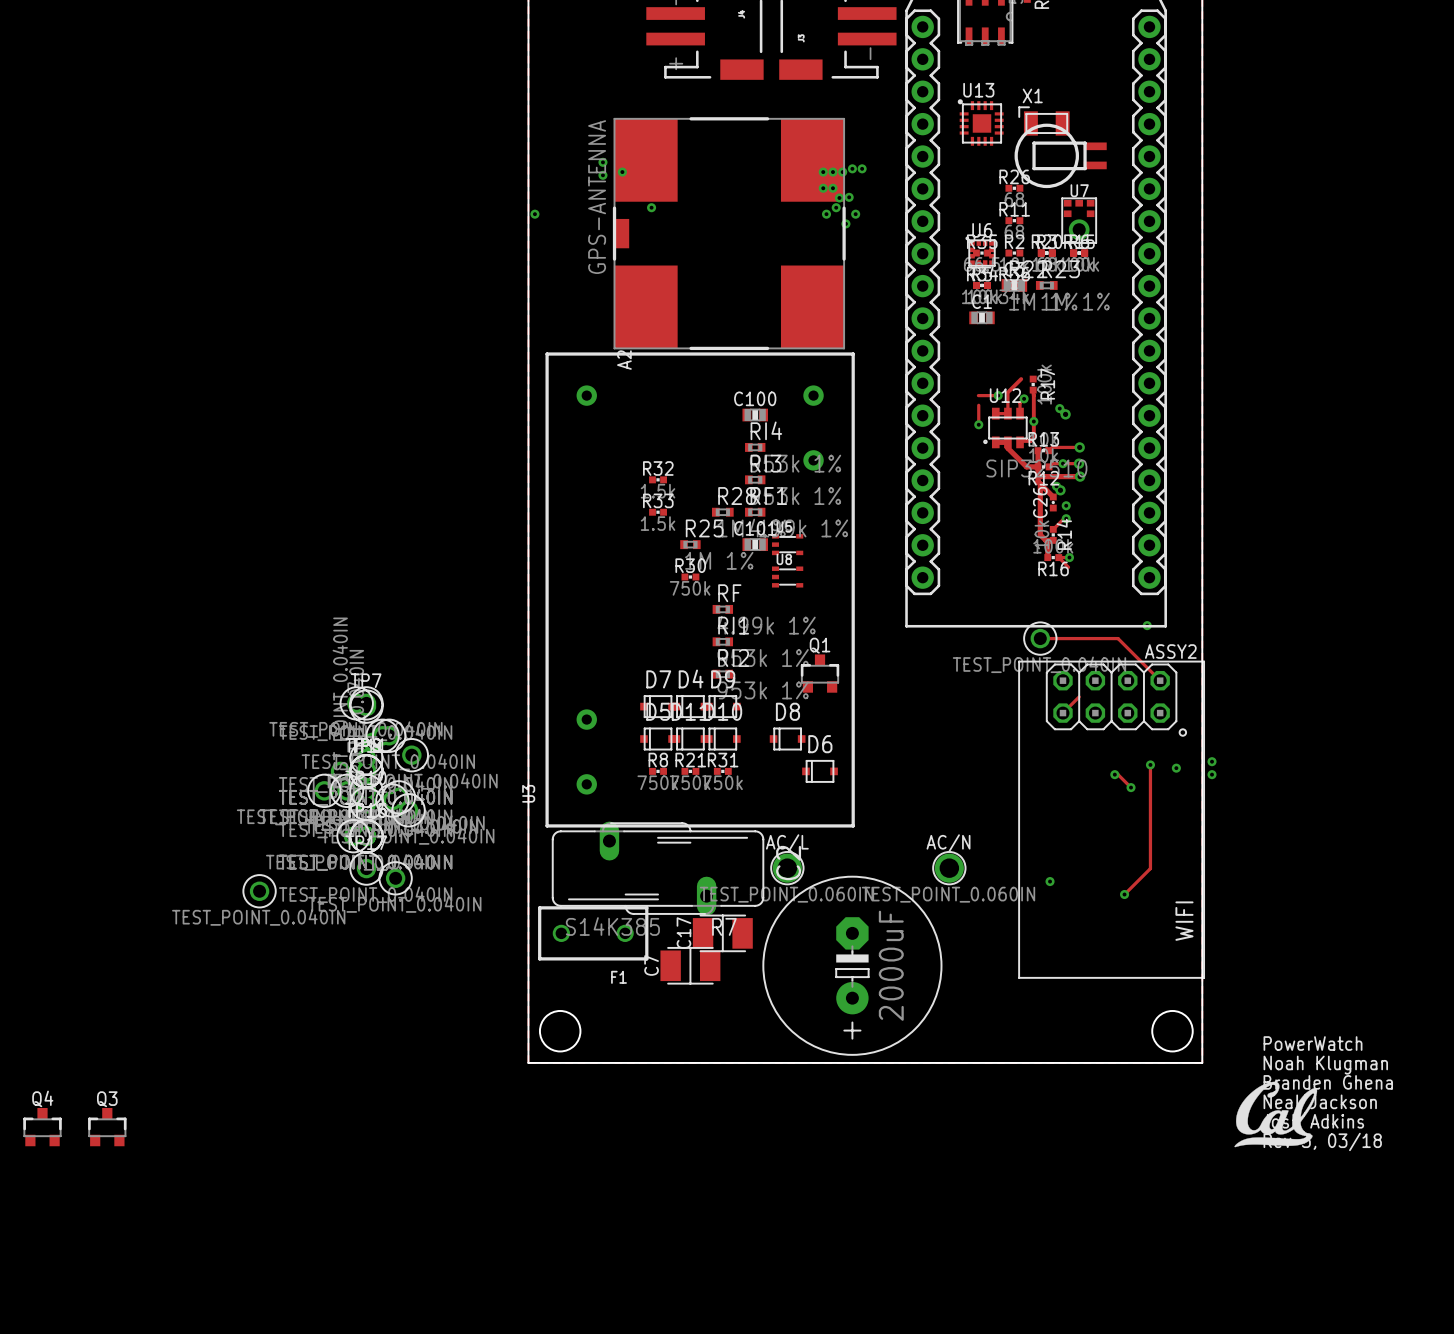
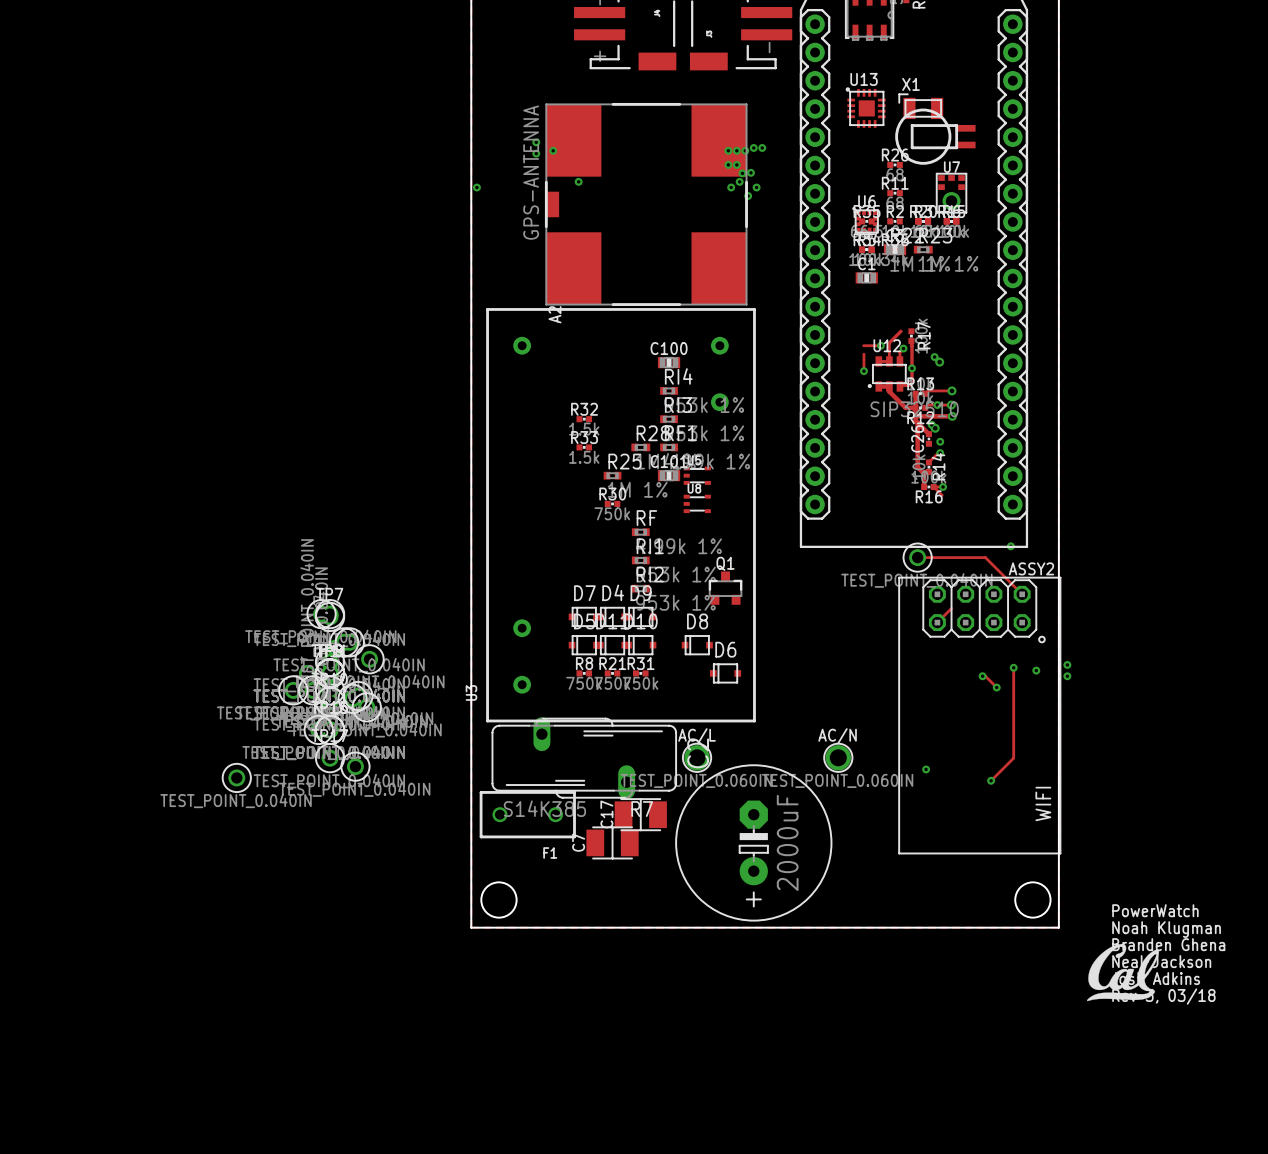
Q4: (42, 1127) -> none
Q3: (107, 1127) -> none

